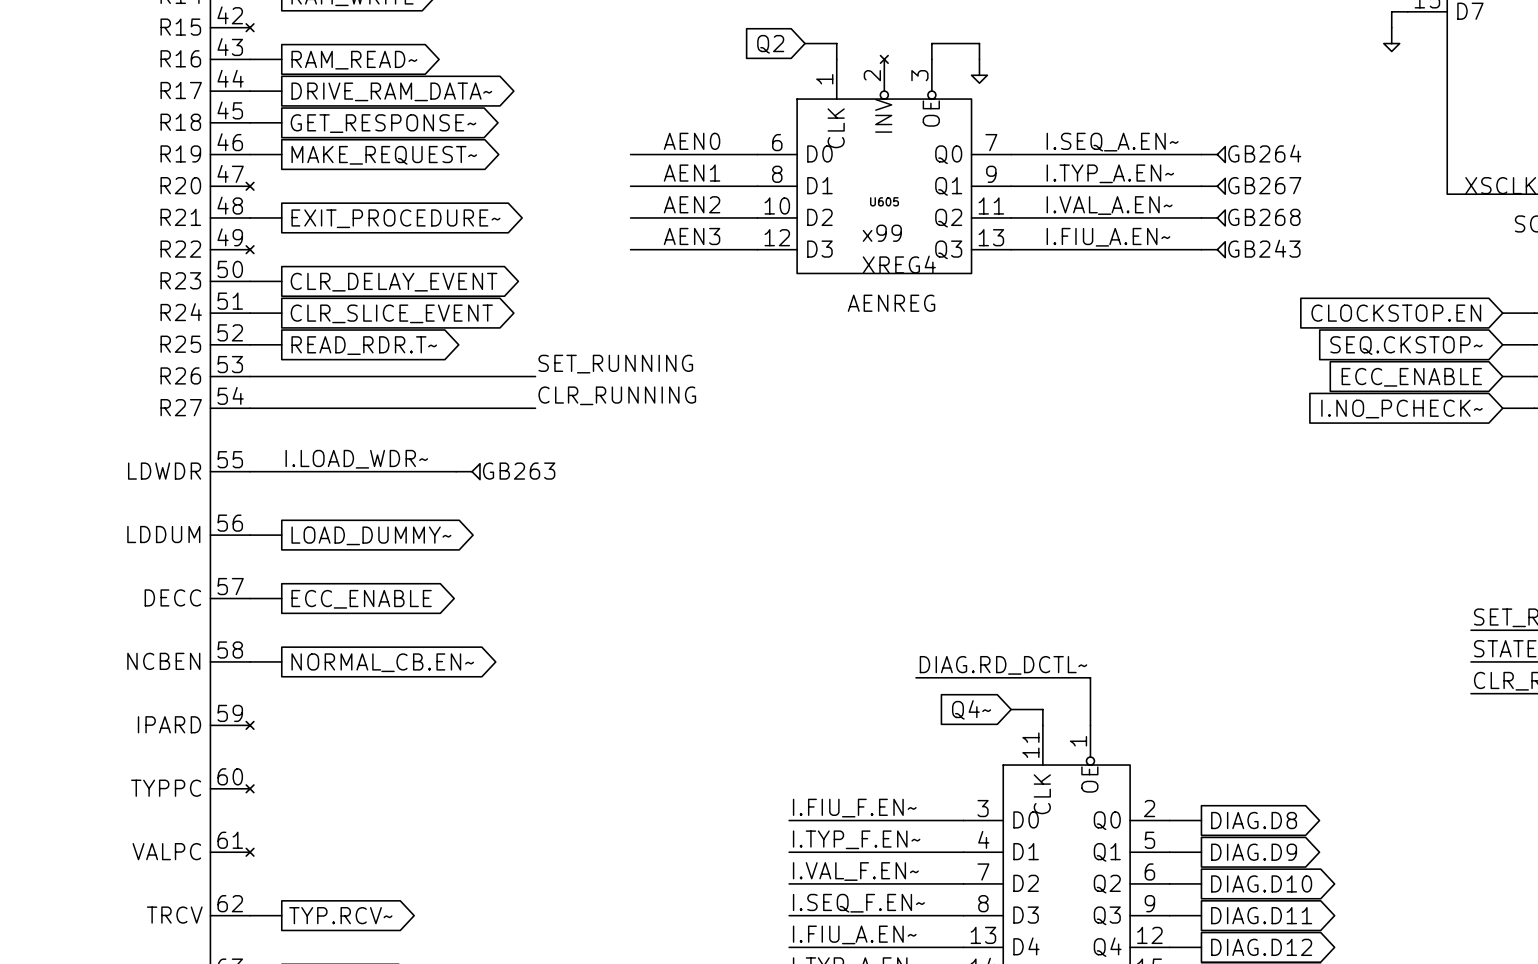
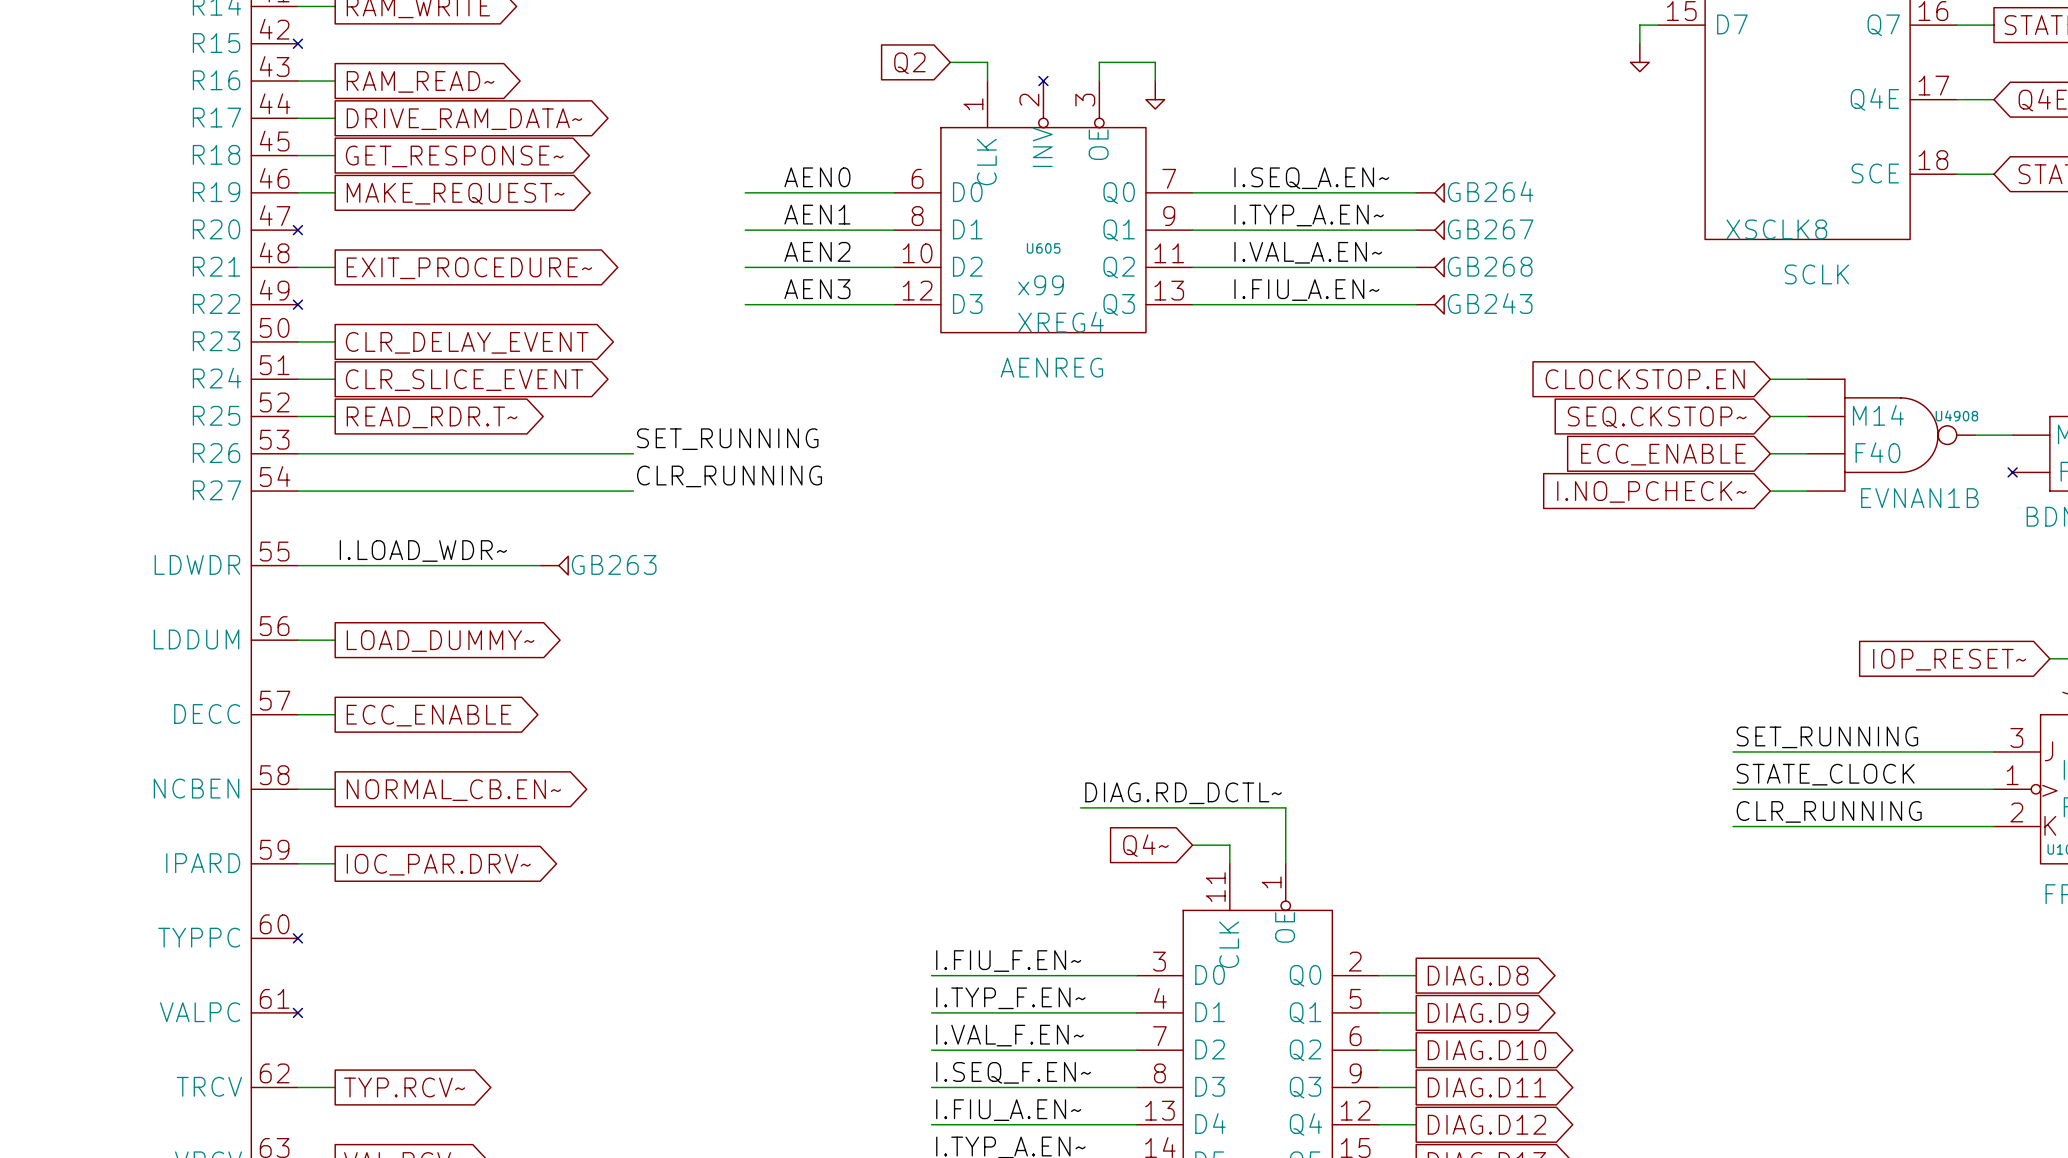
wire: none -> (297, 863) (335, 863)
no-connect mark: (250, 725) -> none
global label: none -> IOC_PAR.DRV~ (438, 864)

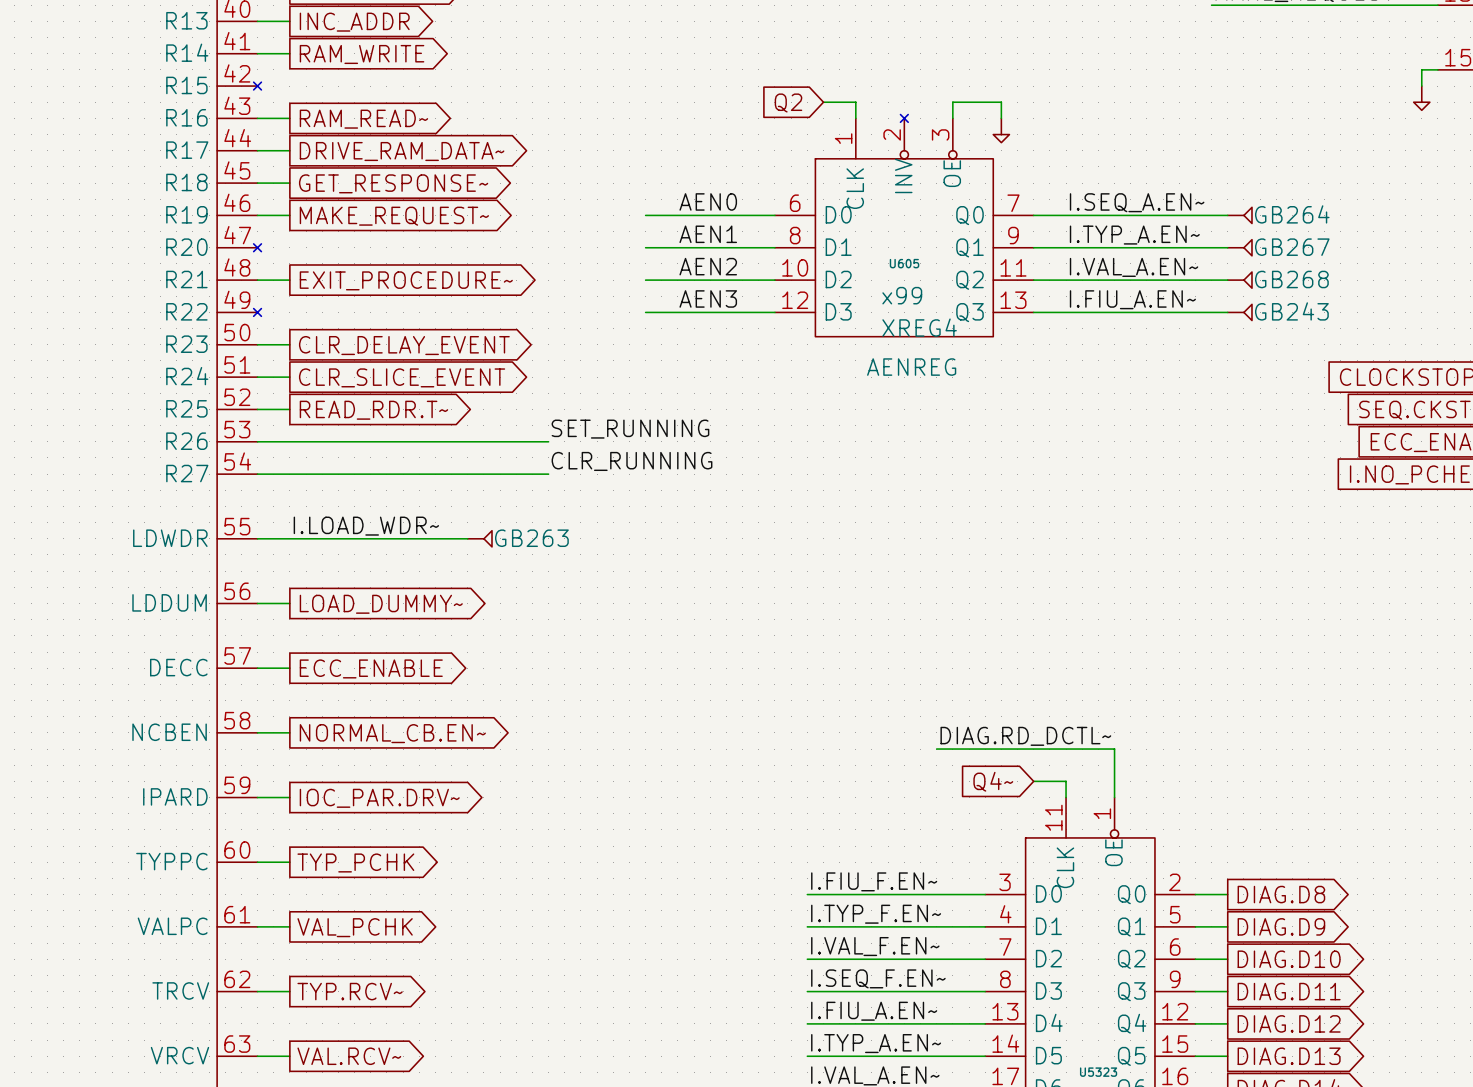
wire: none -> (257, 862) (289, 862)
no-connect mark: (297, 938) -> none
global label: none -> TYP_PCHK (355, 862)
wire: none -> (257, 926) (289, 926)
no-connect mark: (297, 1012) -> none
global label: none -> VAL_PCHK (355, 927)

